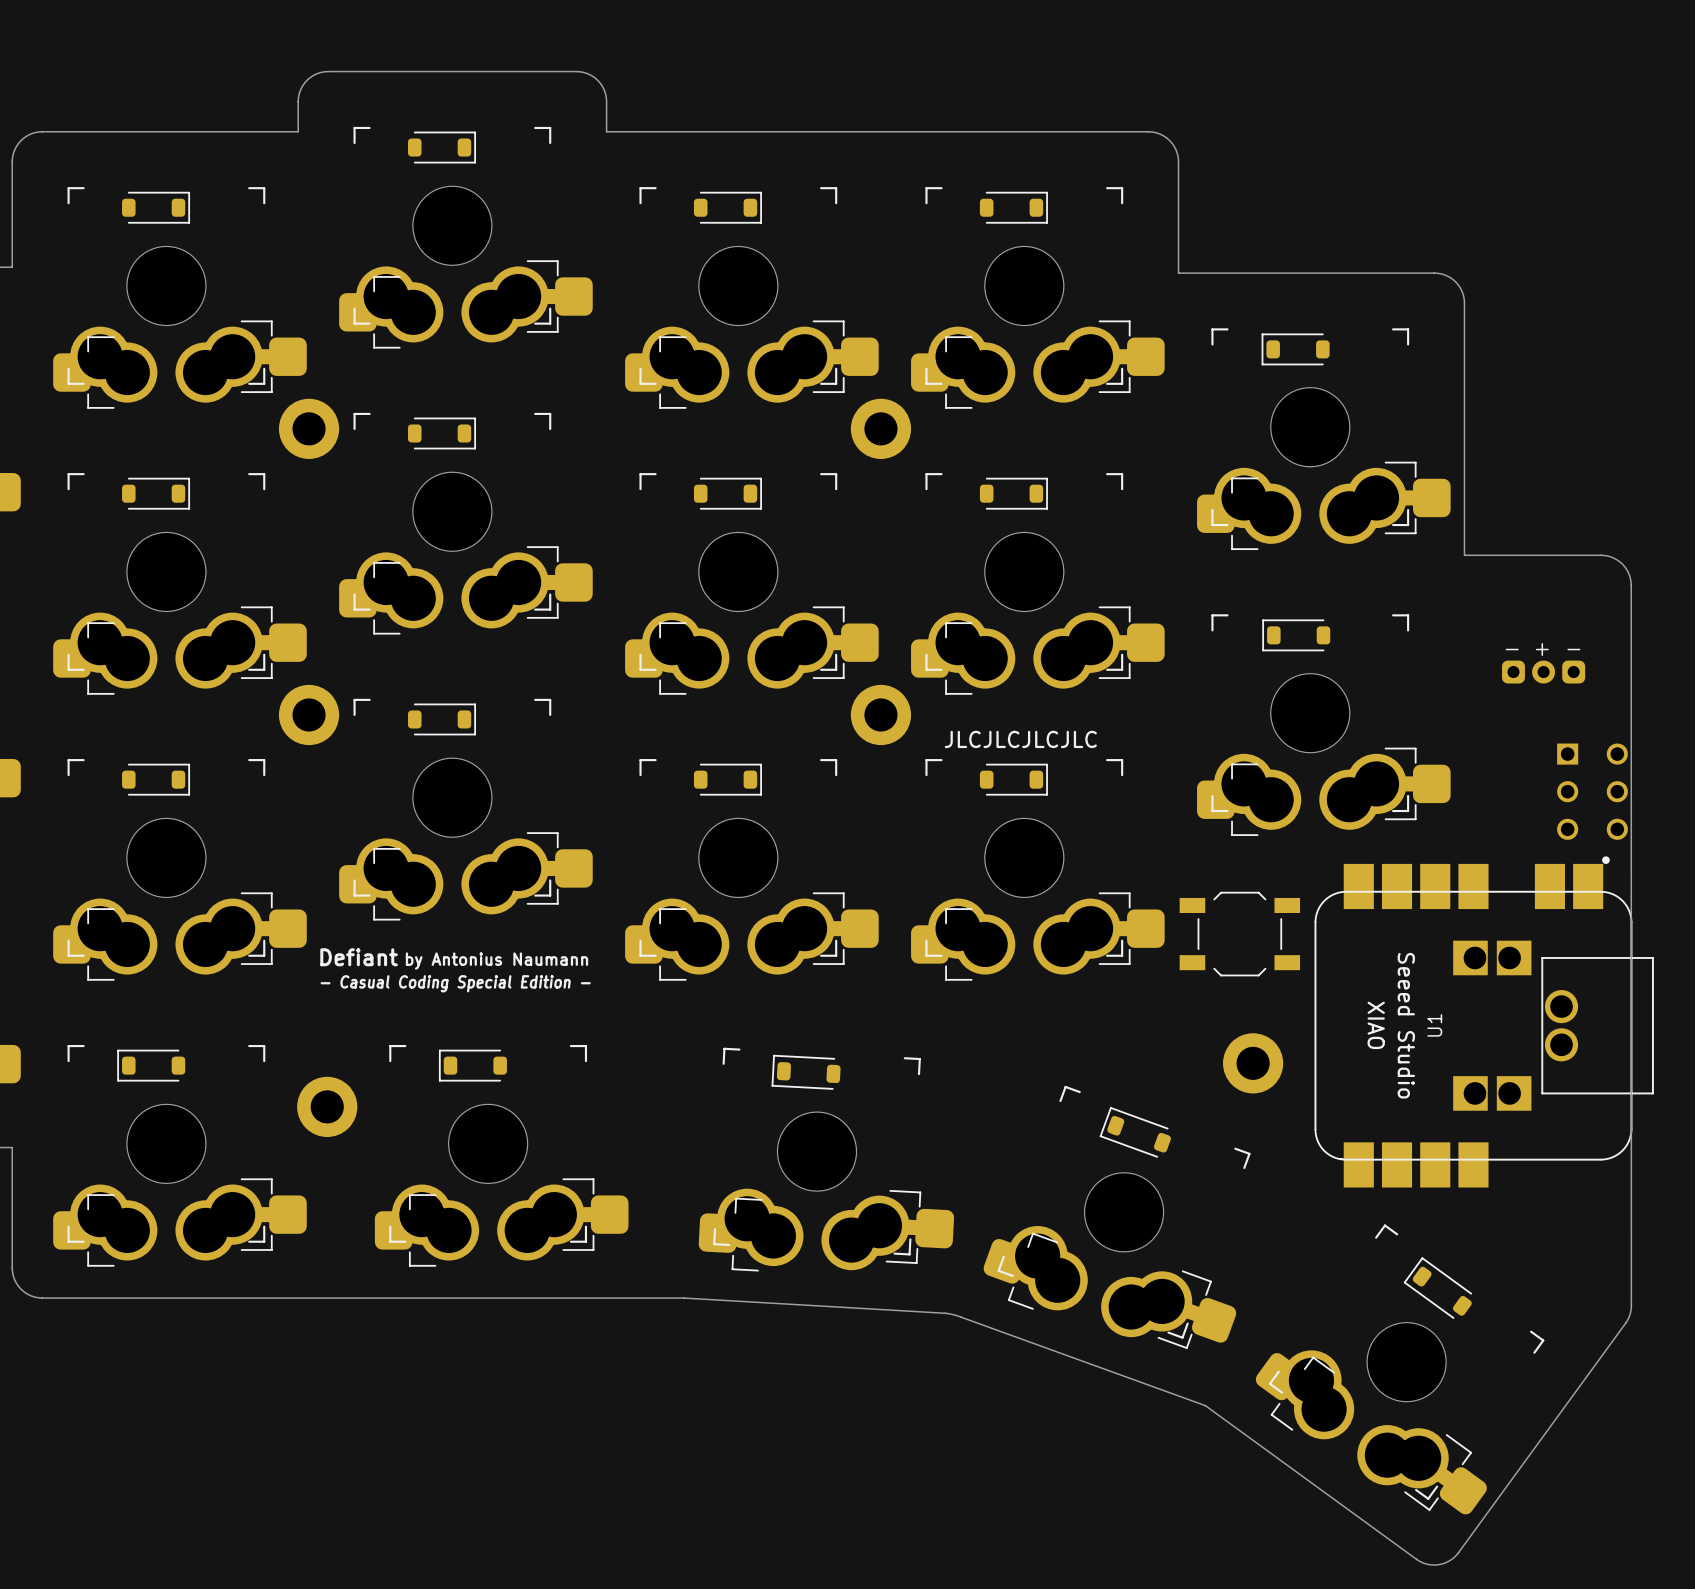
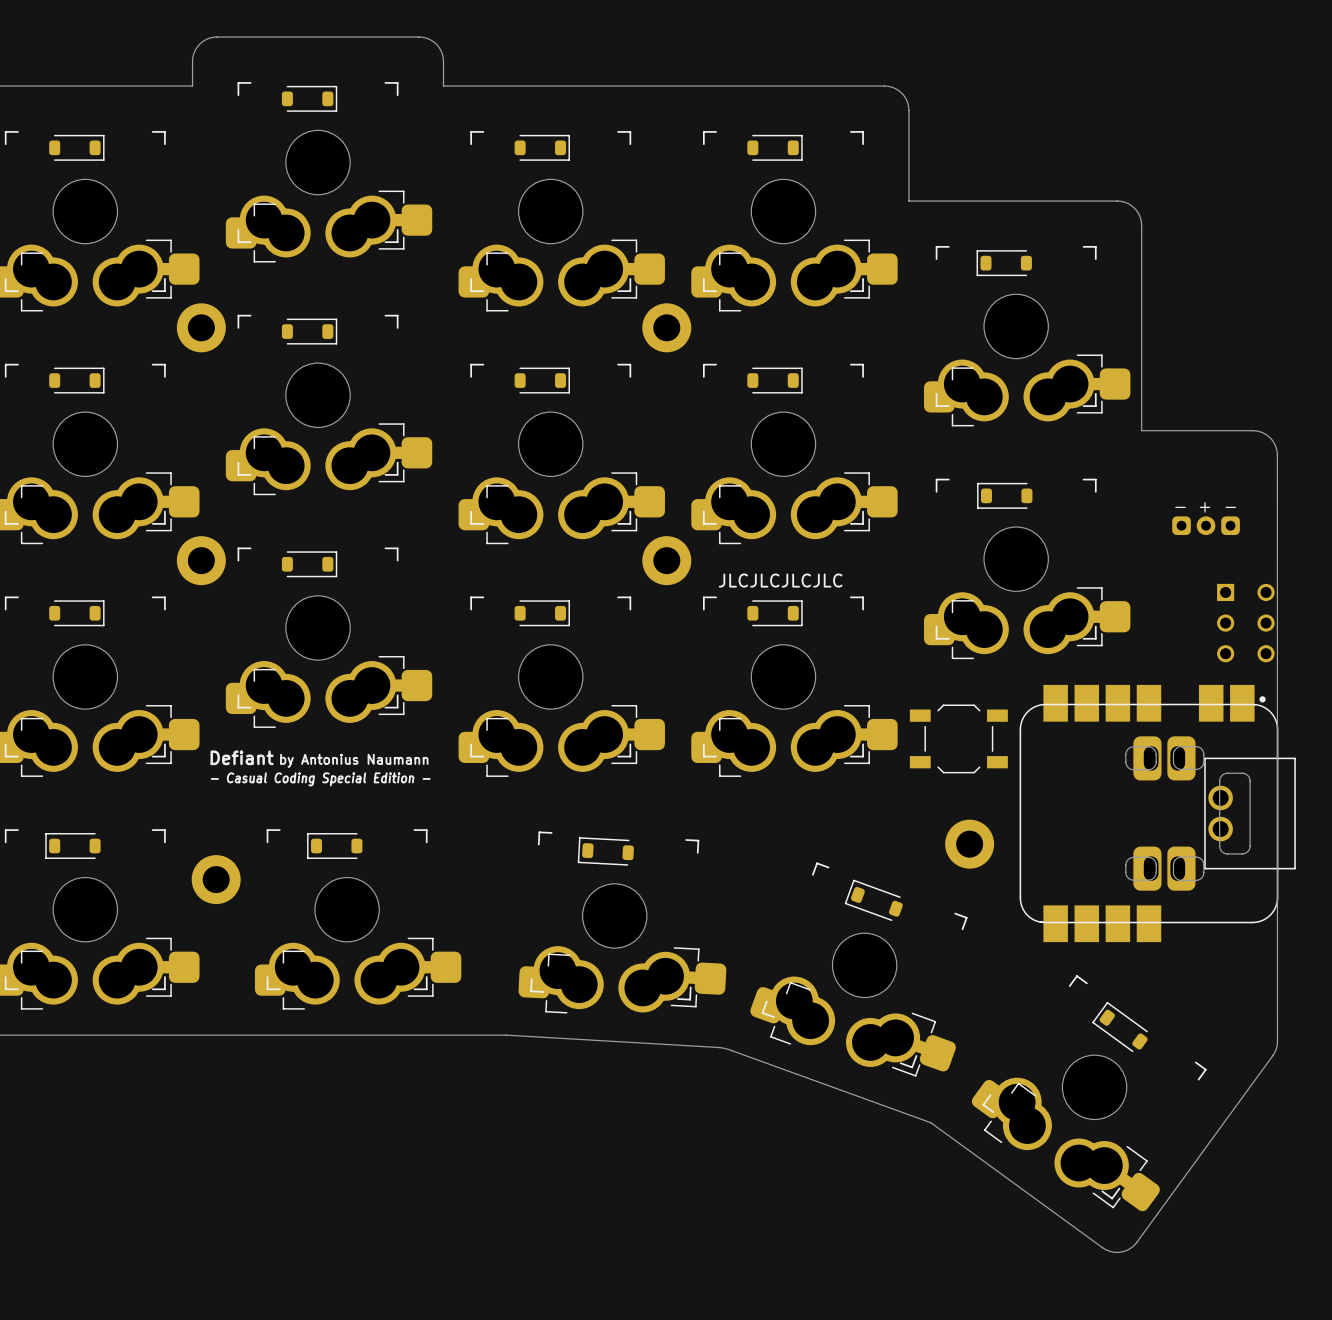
U1: (1484, 1021) -> none
part: none -> (1157, 813)

